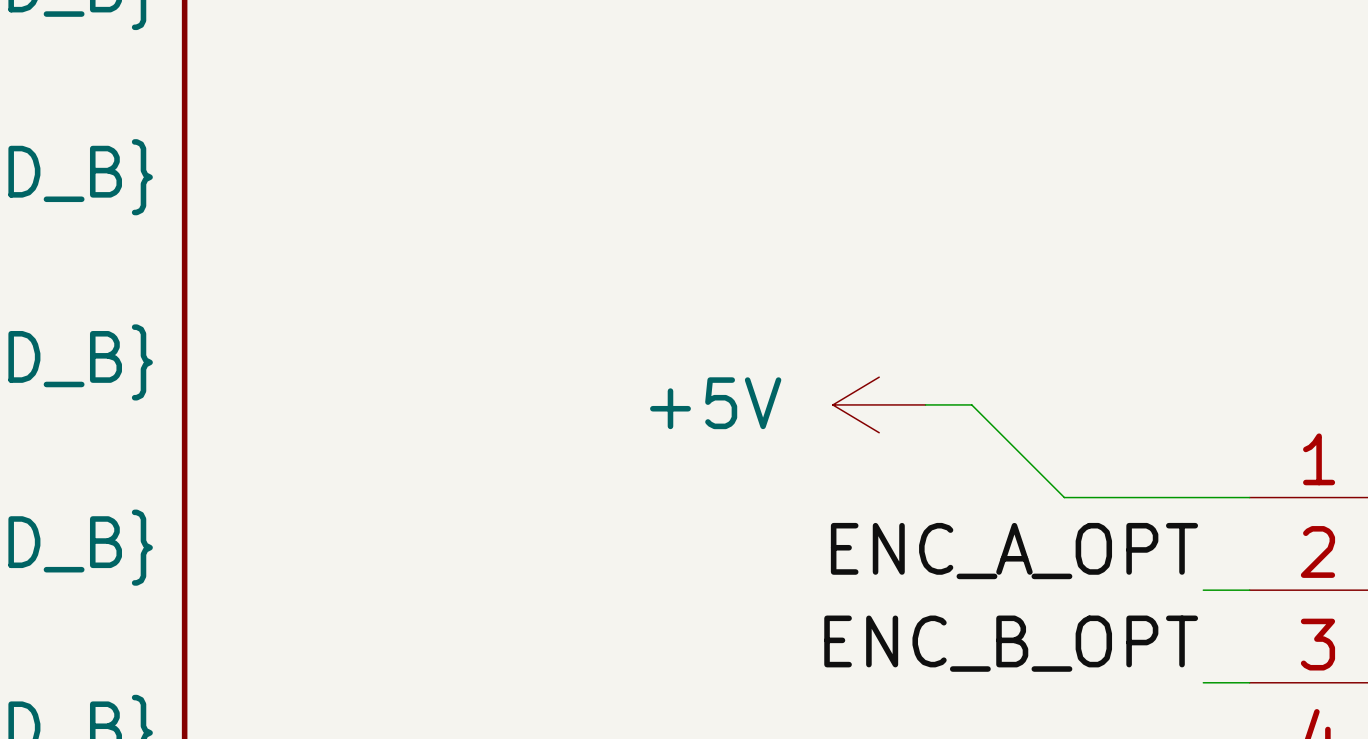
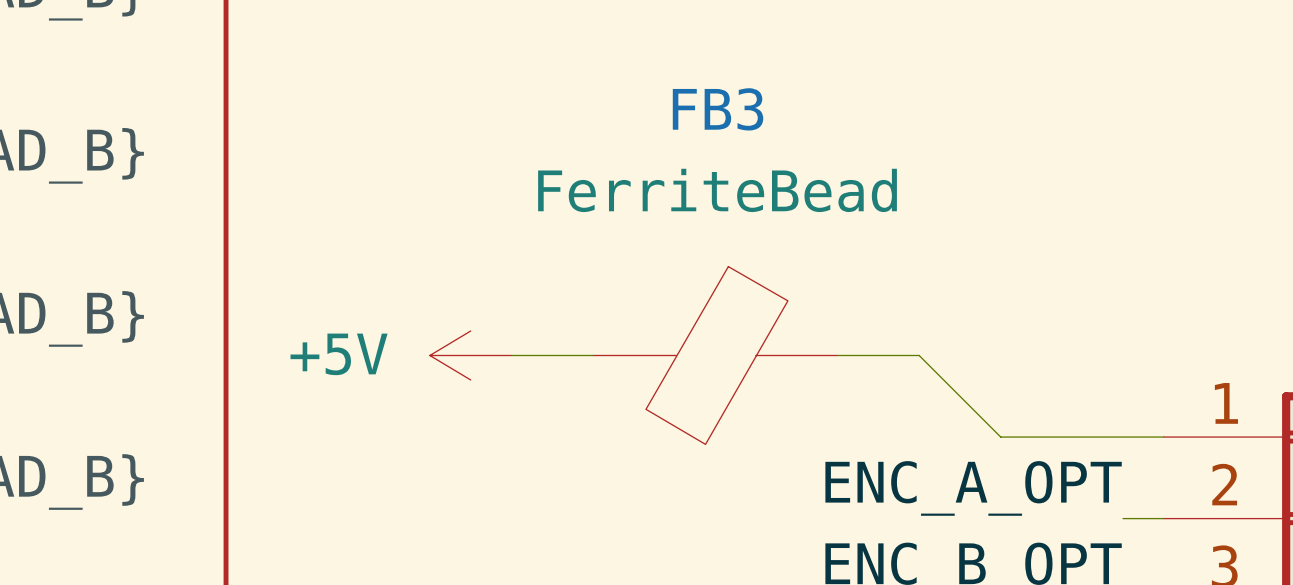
wire: none -> (511, 355) (592, 355)
FB3: none -> FerriteBead (715, 355)
power symbol position: +5V (879, 404) -> +5V (470, 355)

